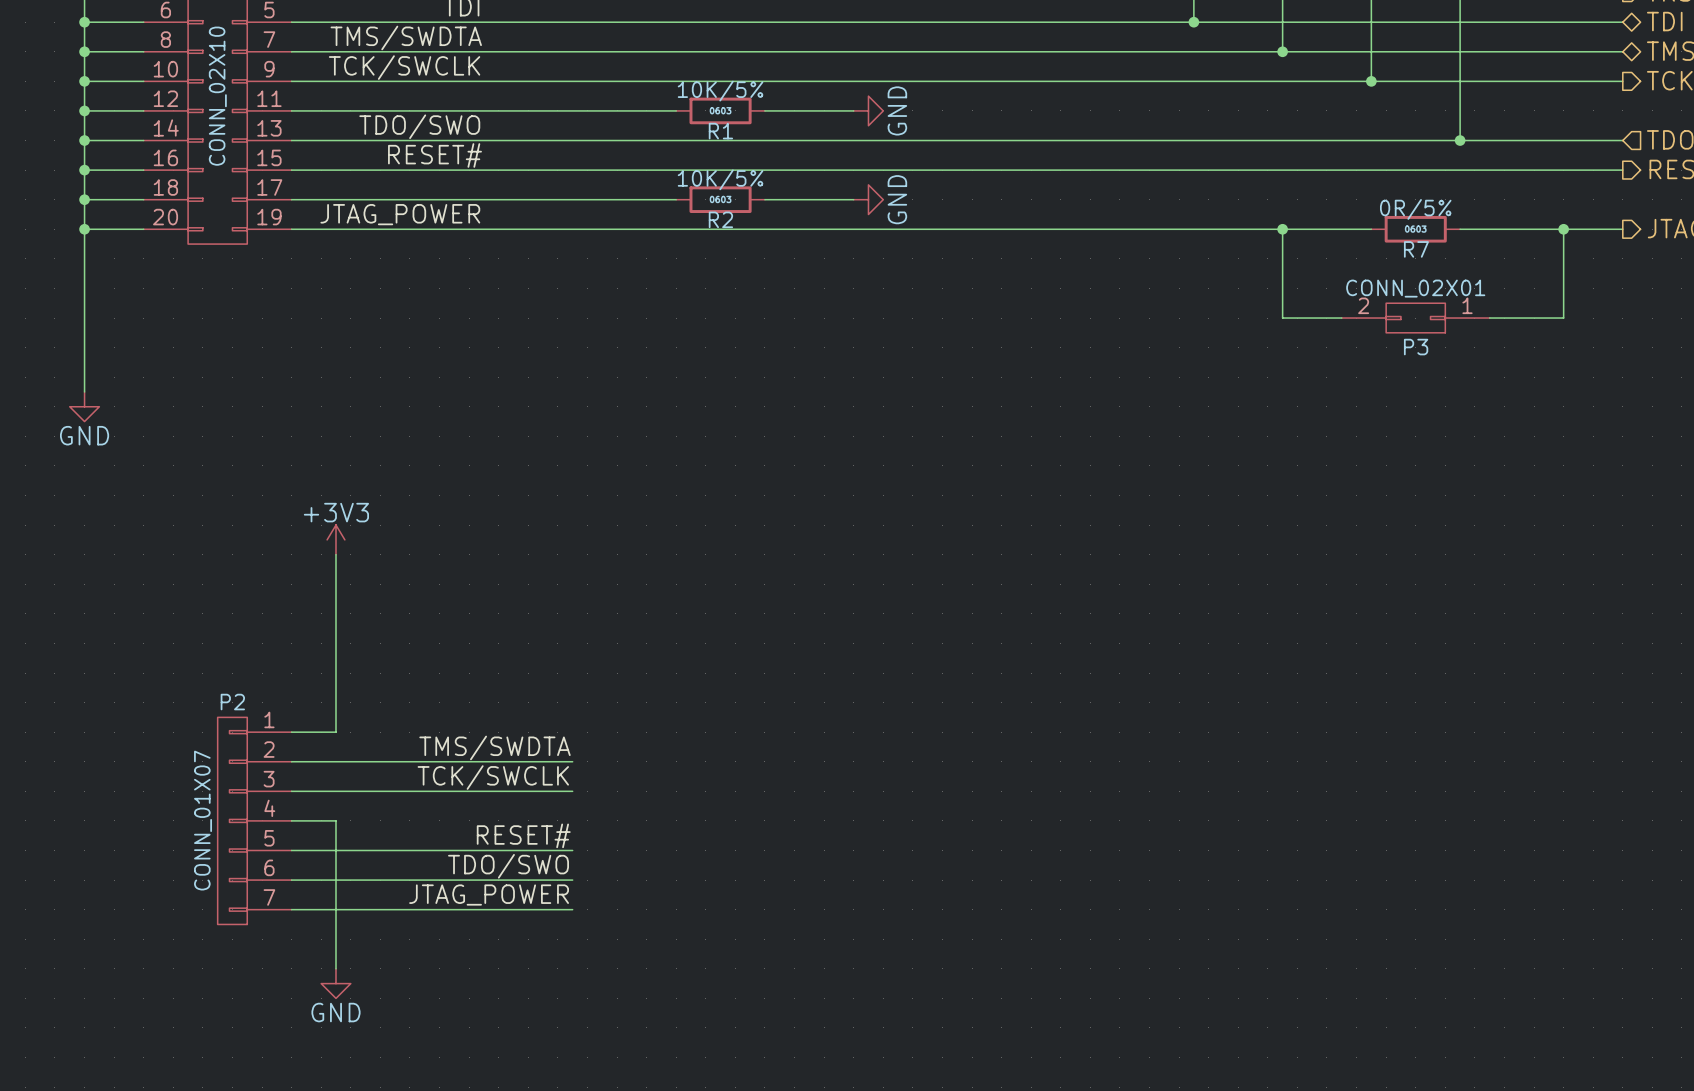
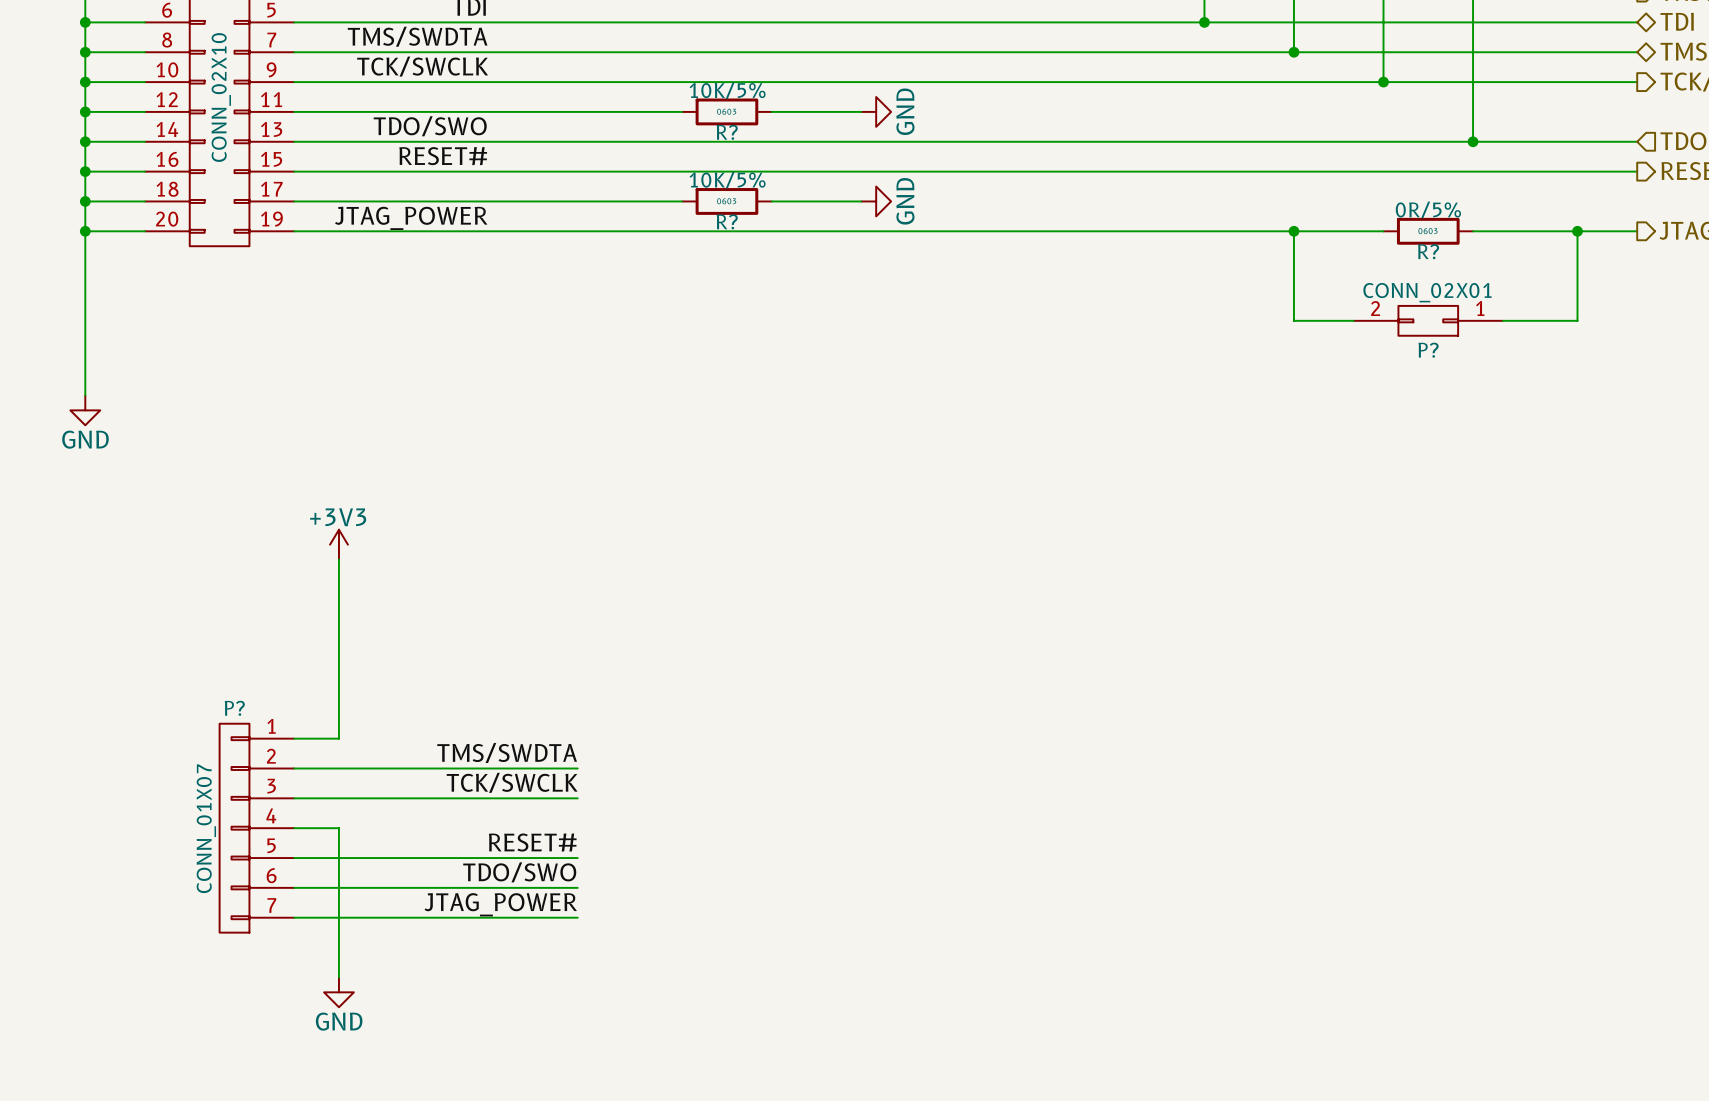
R1 name: R1 (720, 131) -> R? (727, 132)
R2 name: R2 (720, 219) -> R? (727, 221)
R7 name: R7 (1416, 249) -> R? (1428, 251)
P3 name: P3 (1416, 347) -> P? (1428, 350)
P2 name: P2 (232, 702) -> P? (234, 708)

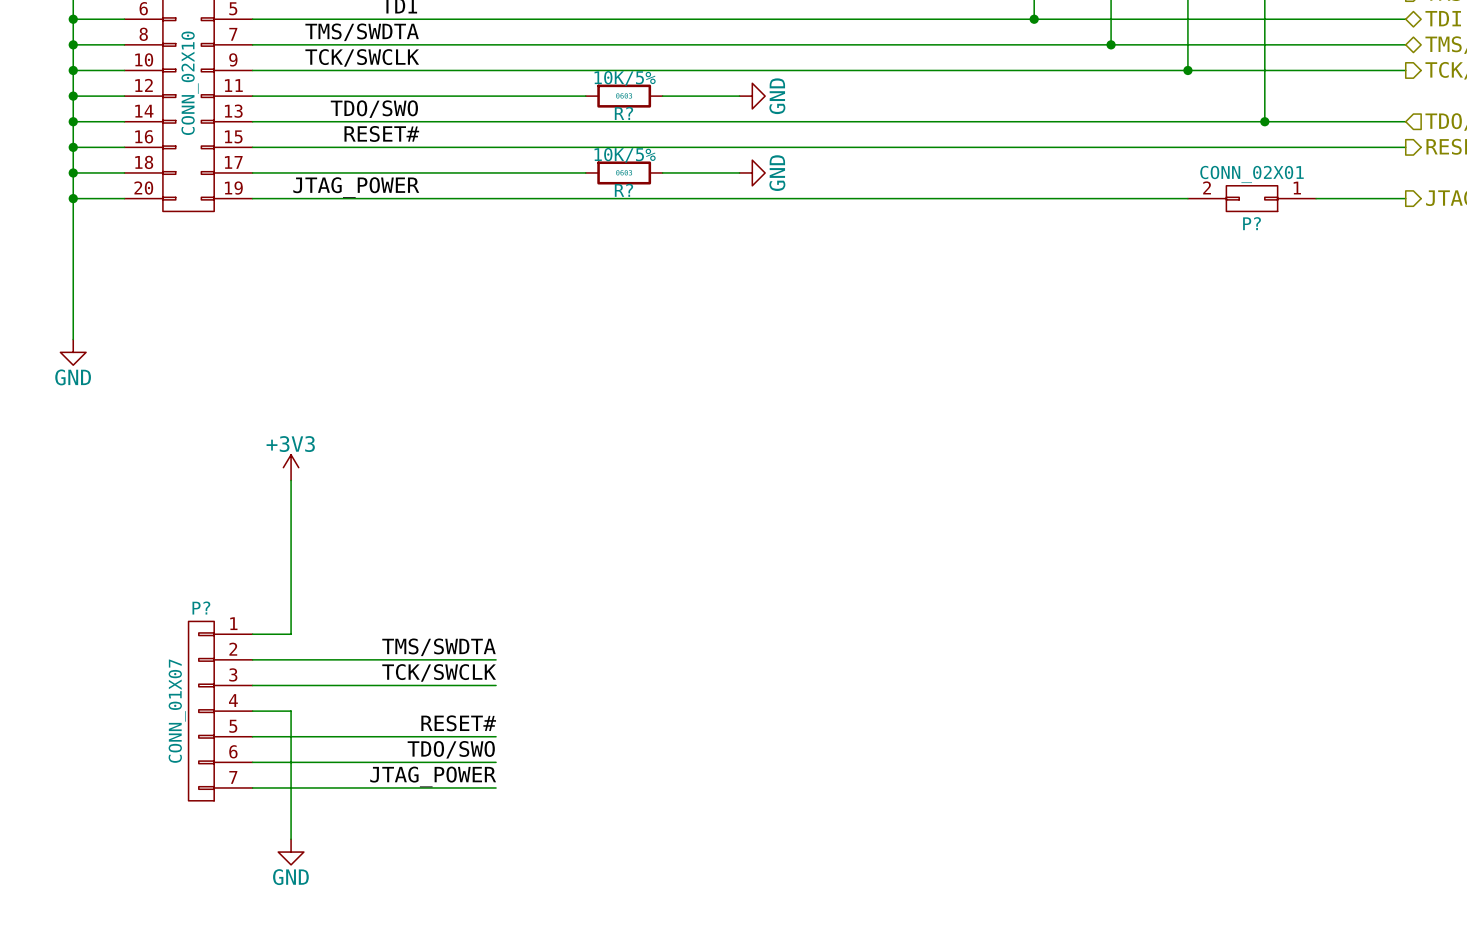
wire: (1293, 231) (1293, 320) (1353, 320) -> none
junction: (1293, 231) -> none
R?: 0R/5% (1428, 231) -> none
wire: (1577, 231) (1577, 320) (1502, 320) -> none
junction: (1577, 231) -> none
P? position: (1428, 320) -> (1252, 198)

